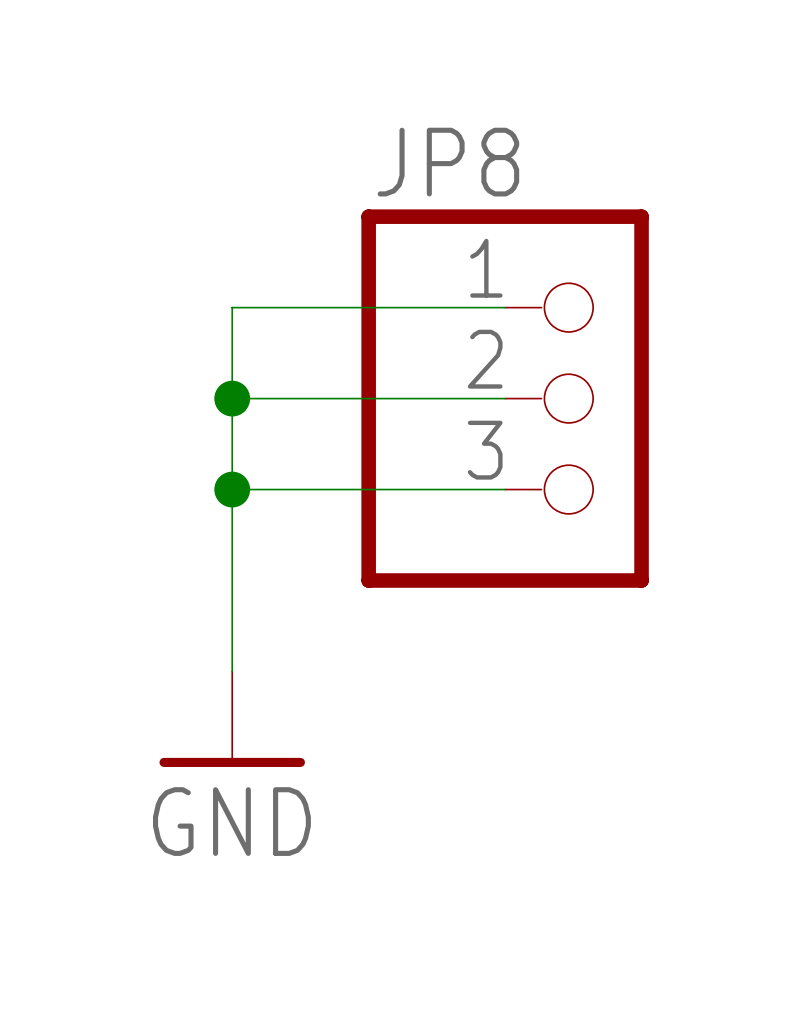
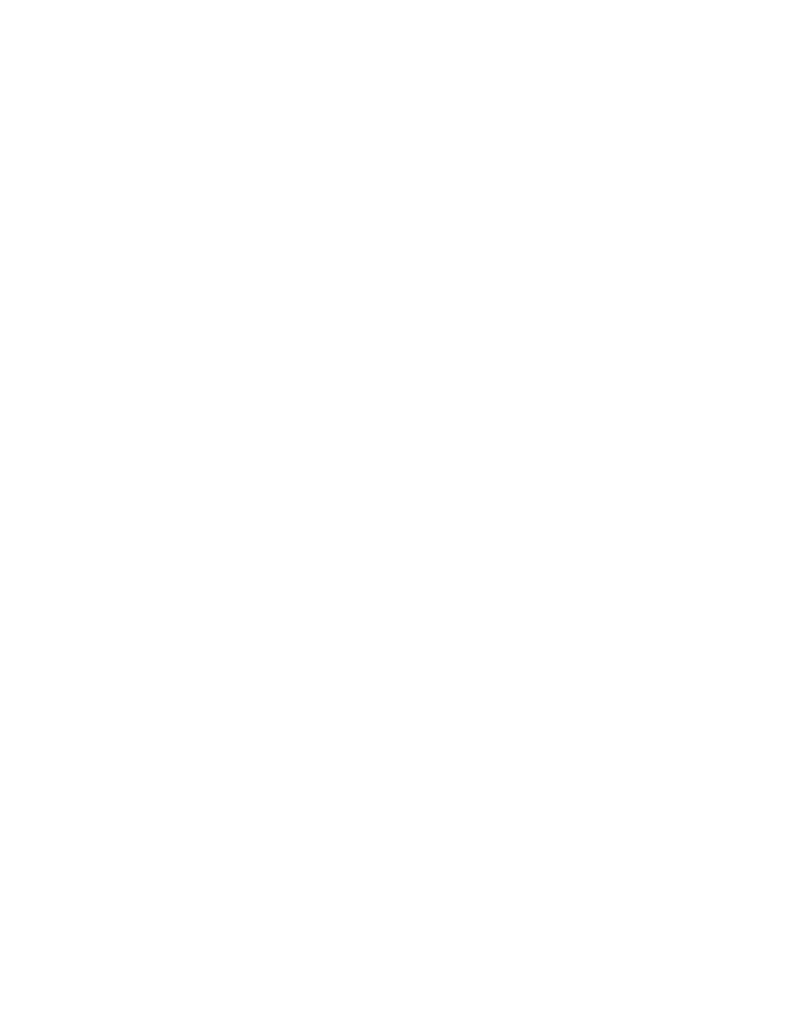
wire: (505, 307) (232, 307) (232, 671) -> none
wire: (232, 398) (505, 398) -> none
junction: (232, 398) -> none
JP8: (505, 398) -> none
wire: (232, 489) (505, 489) -> none
junction: (232, 489) -> none
power symbol: GND (232, 719) -> none

